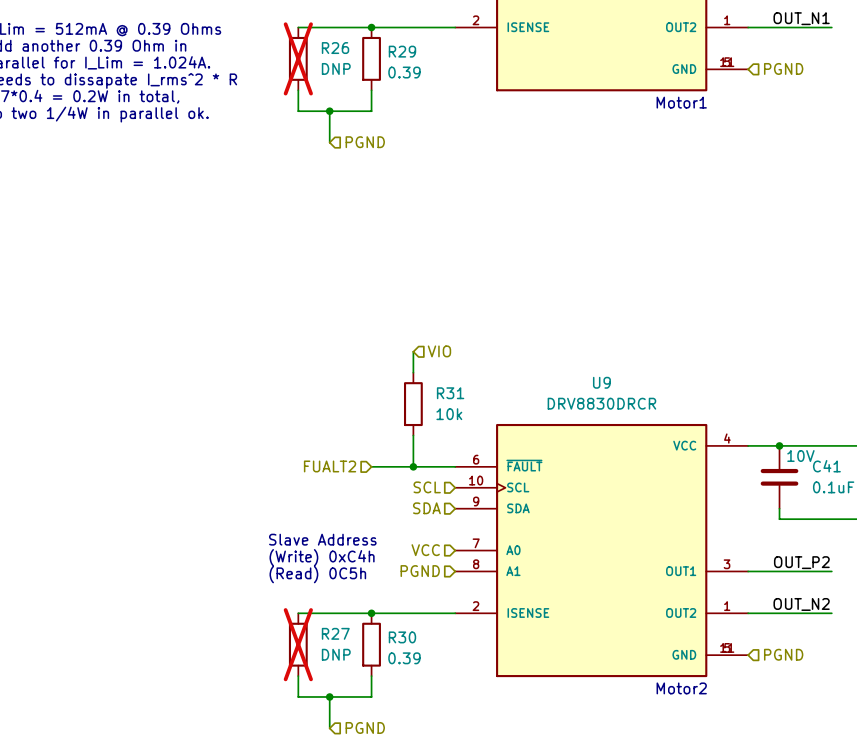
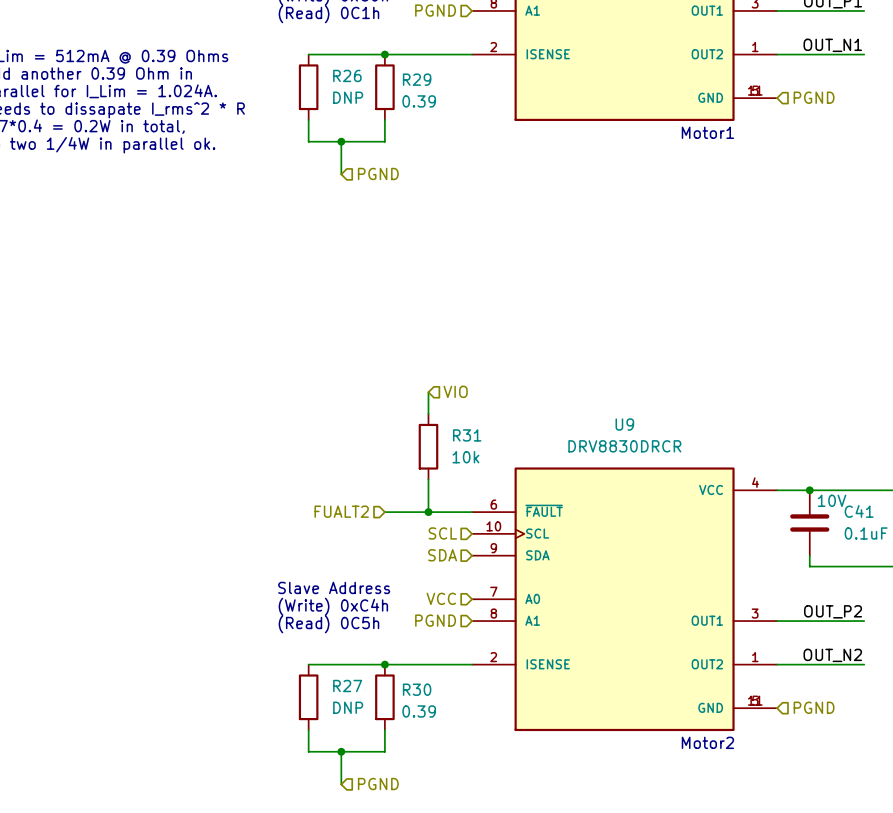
R26 do-not-place cross: (298, 58) -> none
R27 do-not-place cross: (298, 644) -> none

